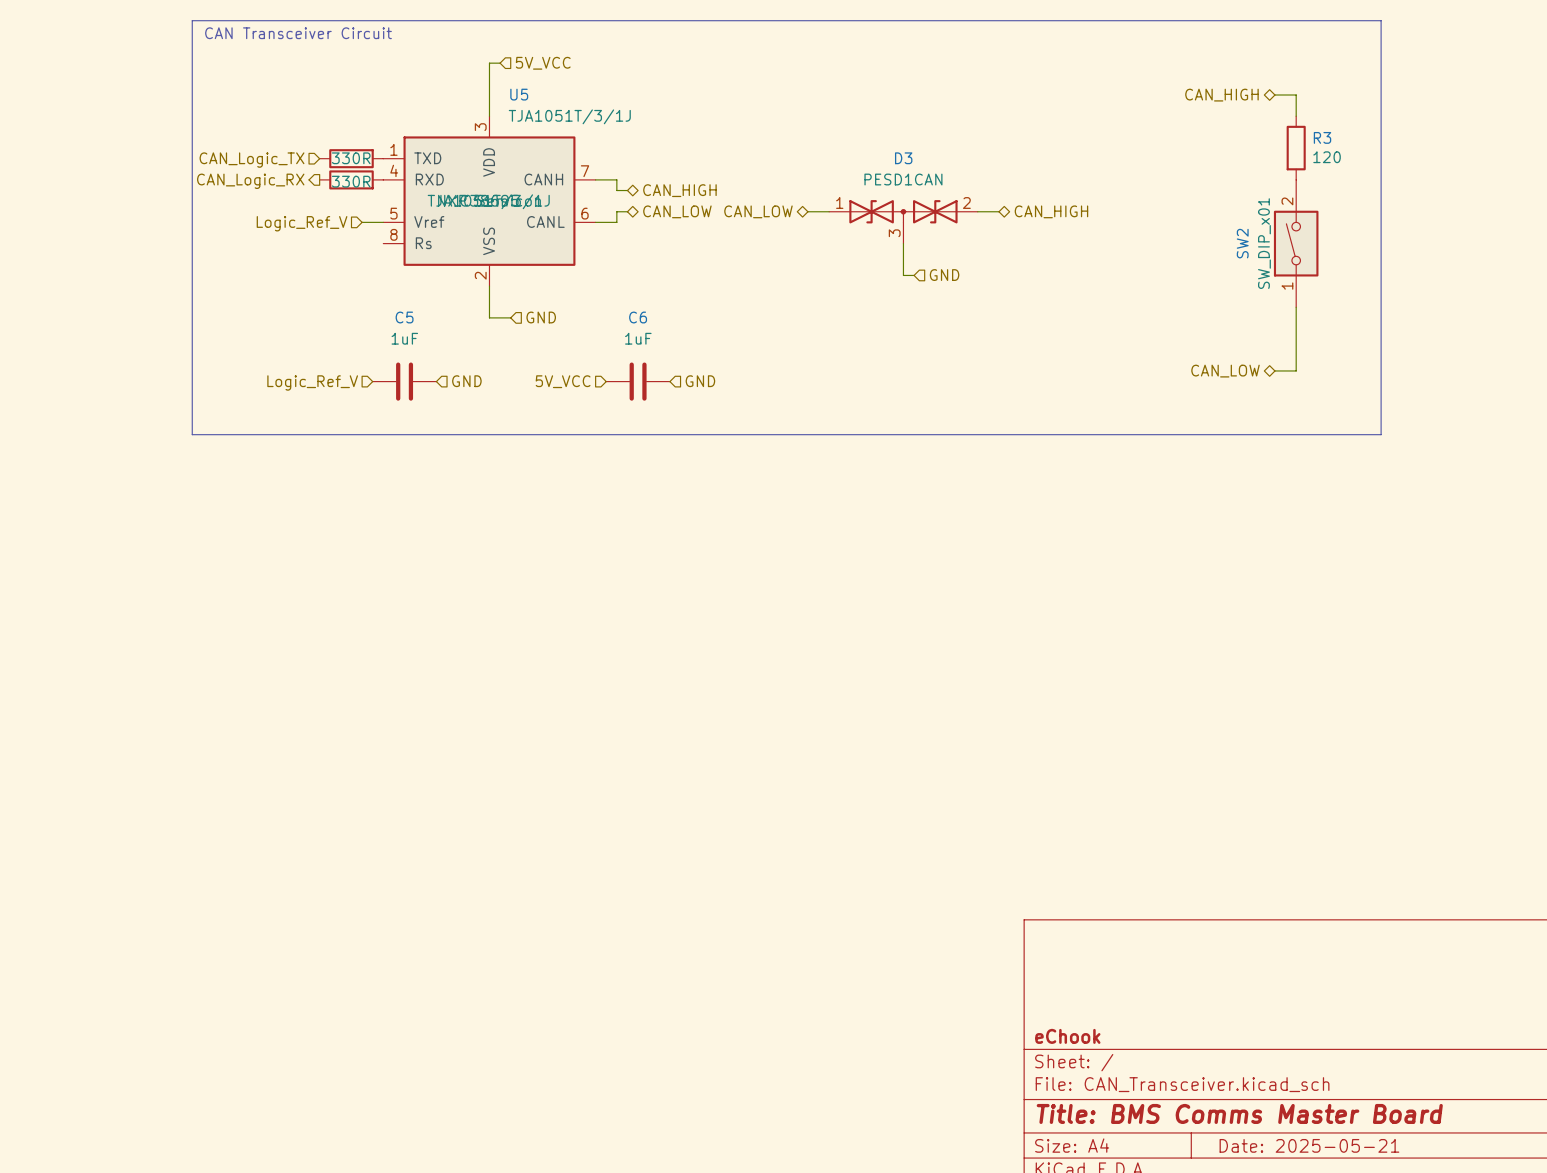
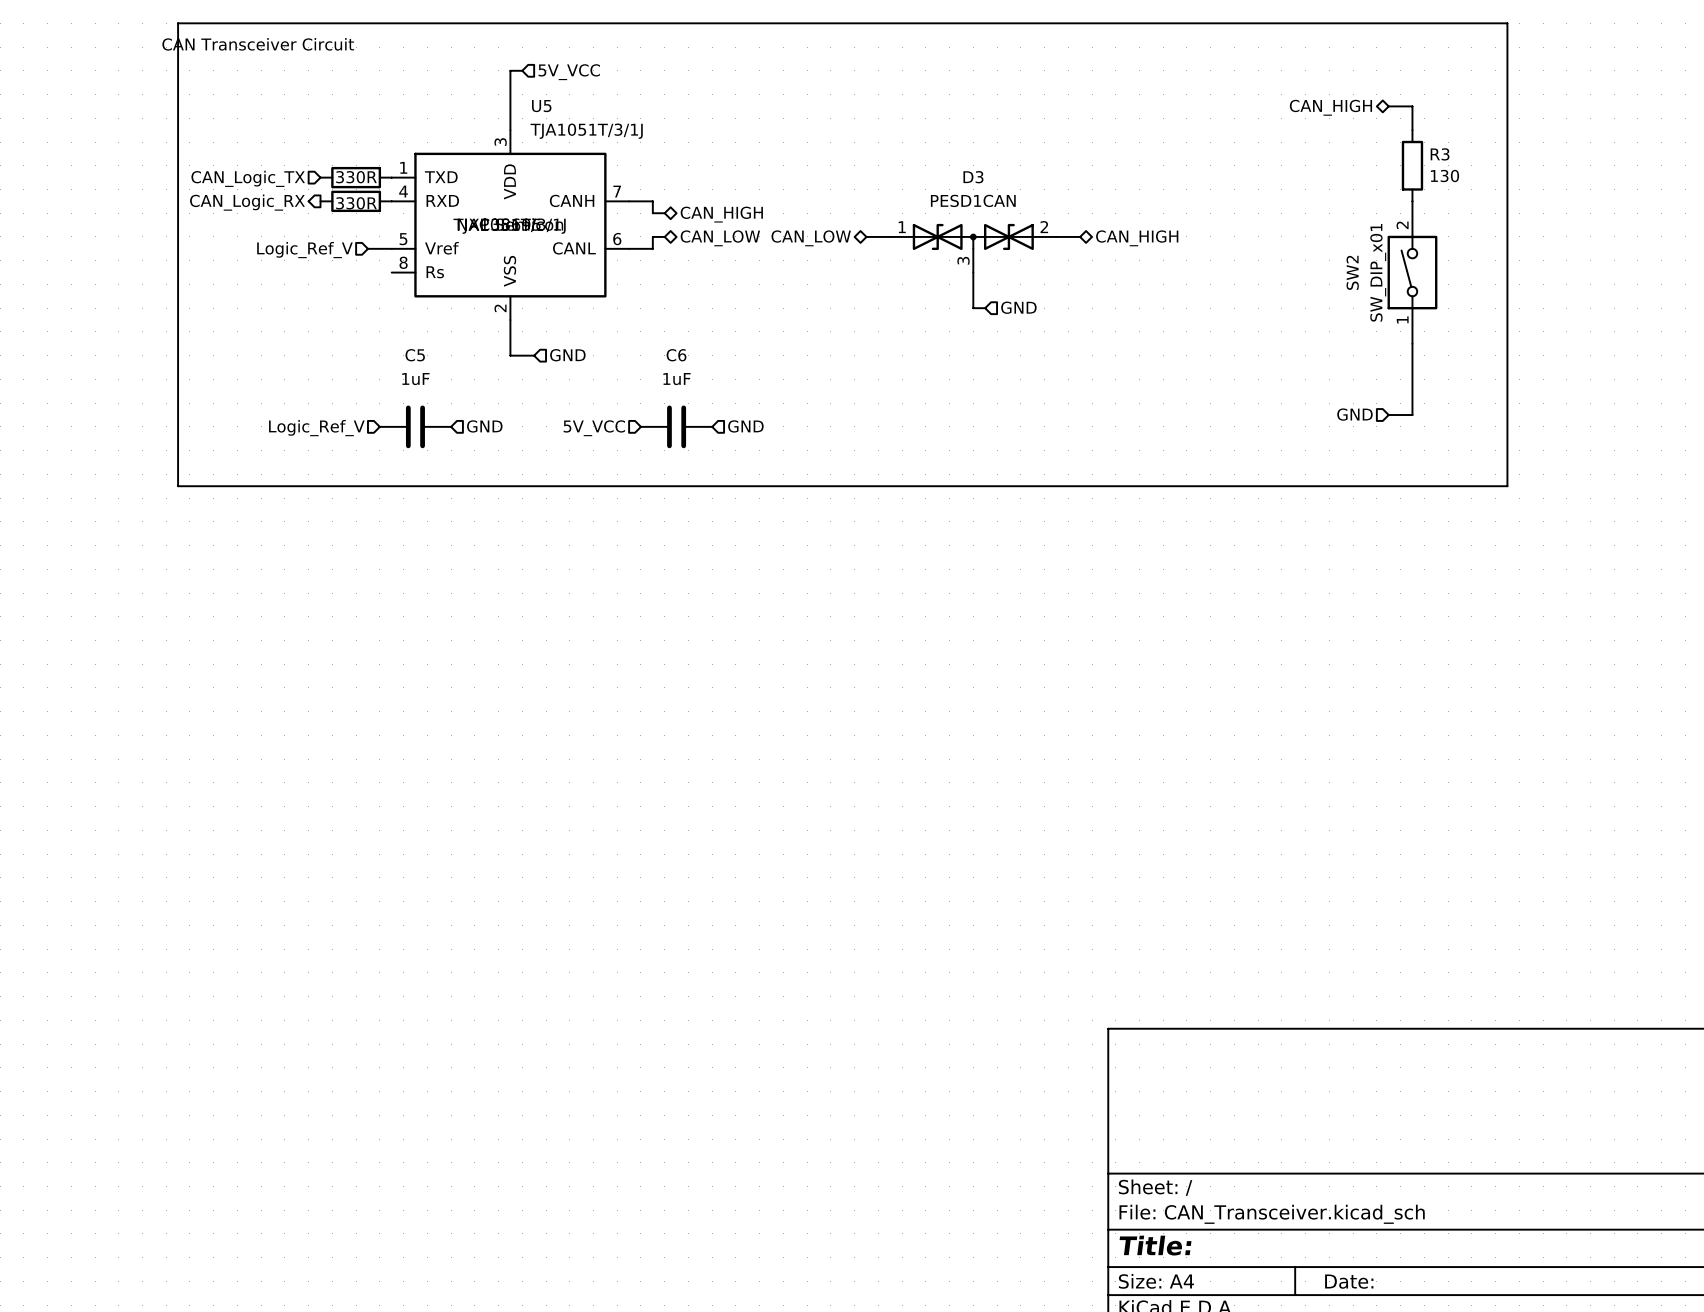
text position: CAN Transceiver Circuit (298, 33) -> CAN Transceiver Circuit (258, 44)
R3 value: 120 (1327, 157) -> 130 (1444, 176)
hierarchical label shape: bidirectional (1225, 371) -> input (1354, 414)
hierarchical label: CAN_LOW (1225, 371) -> GND (1354, 414)
title block: eChook (1067, 1036) -> none
title block: Title: BMS Comms Master Board (1239, 1113) -> Title: (1155, 1245)
title block: Date: 2025-05-21 (1309, 1145) -> Date: (1349, 1281)

